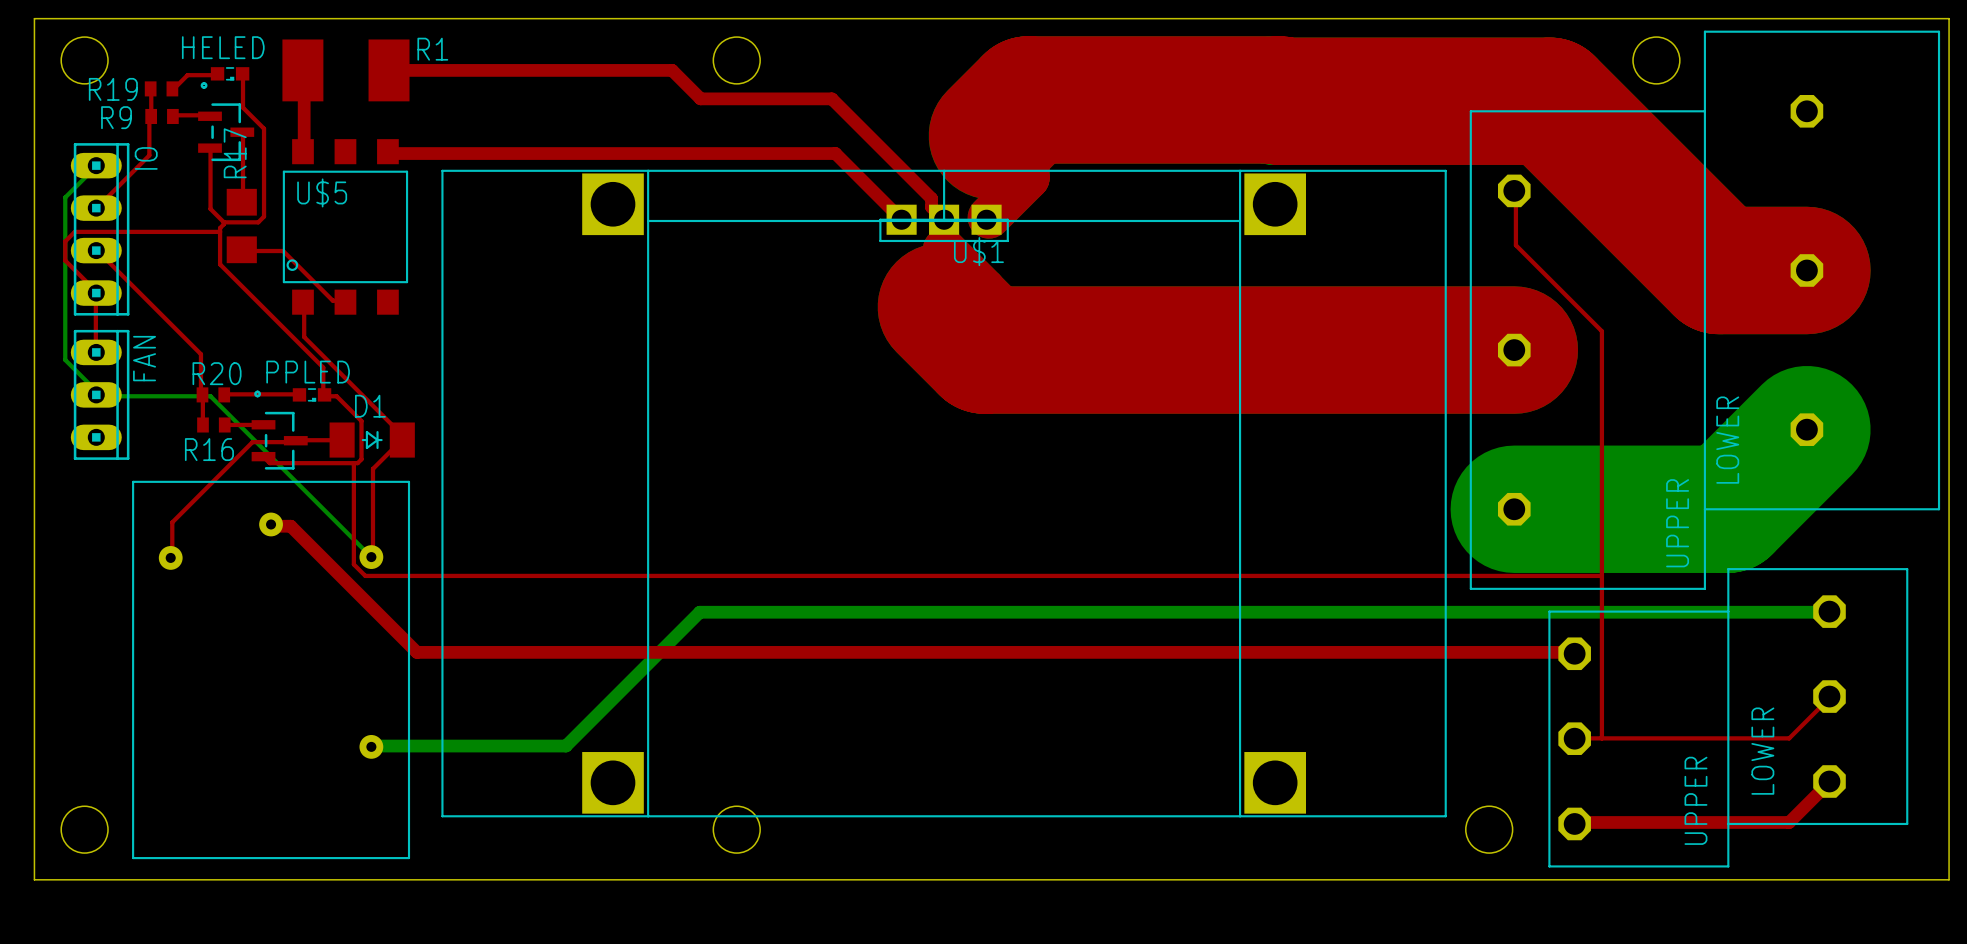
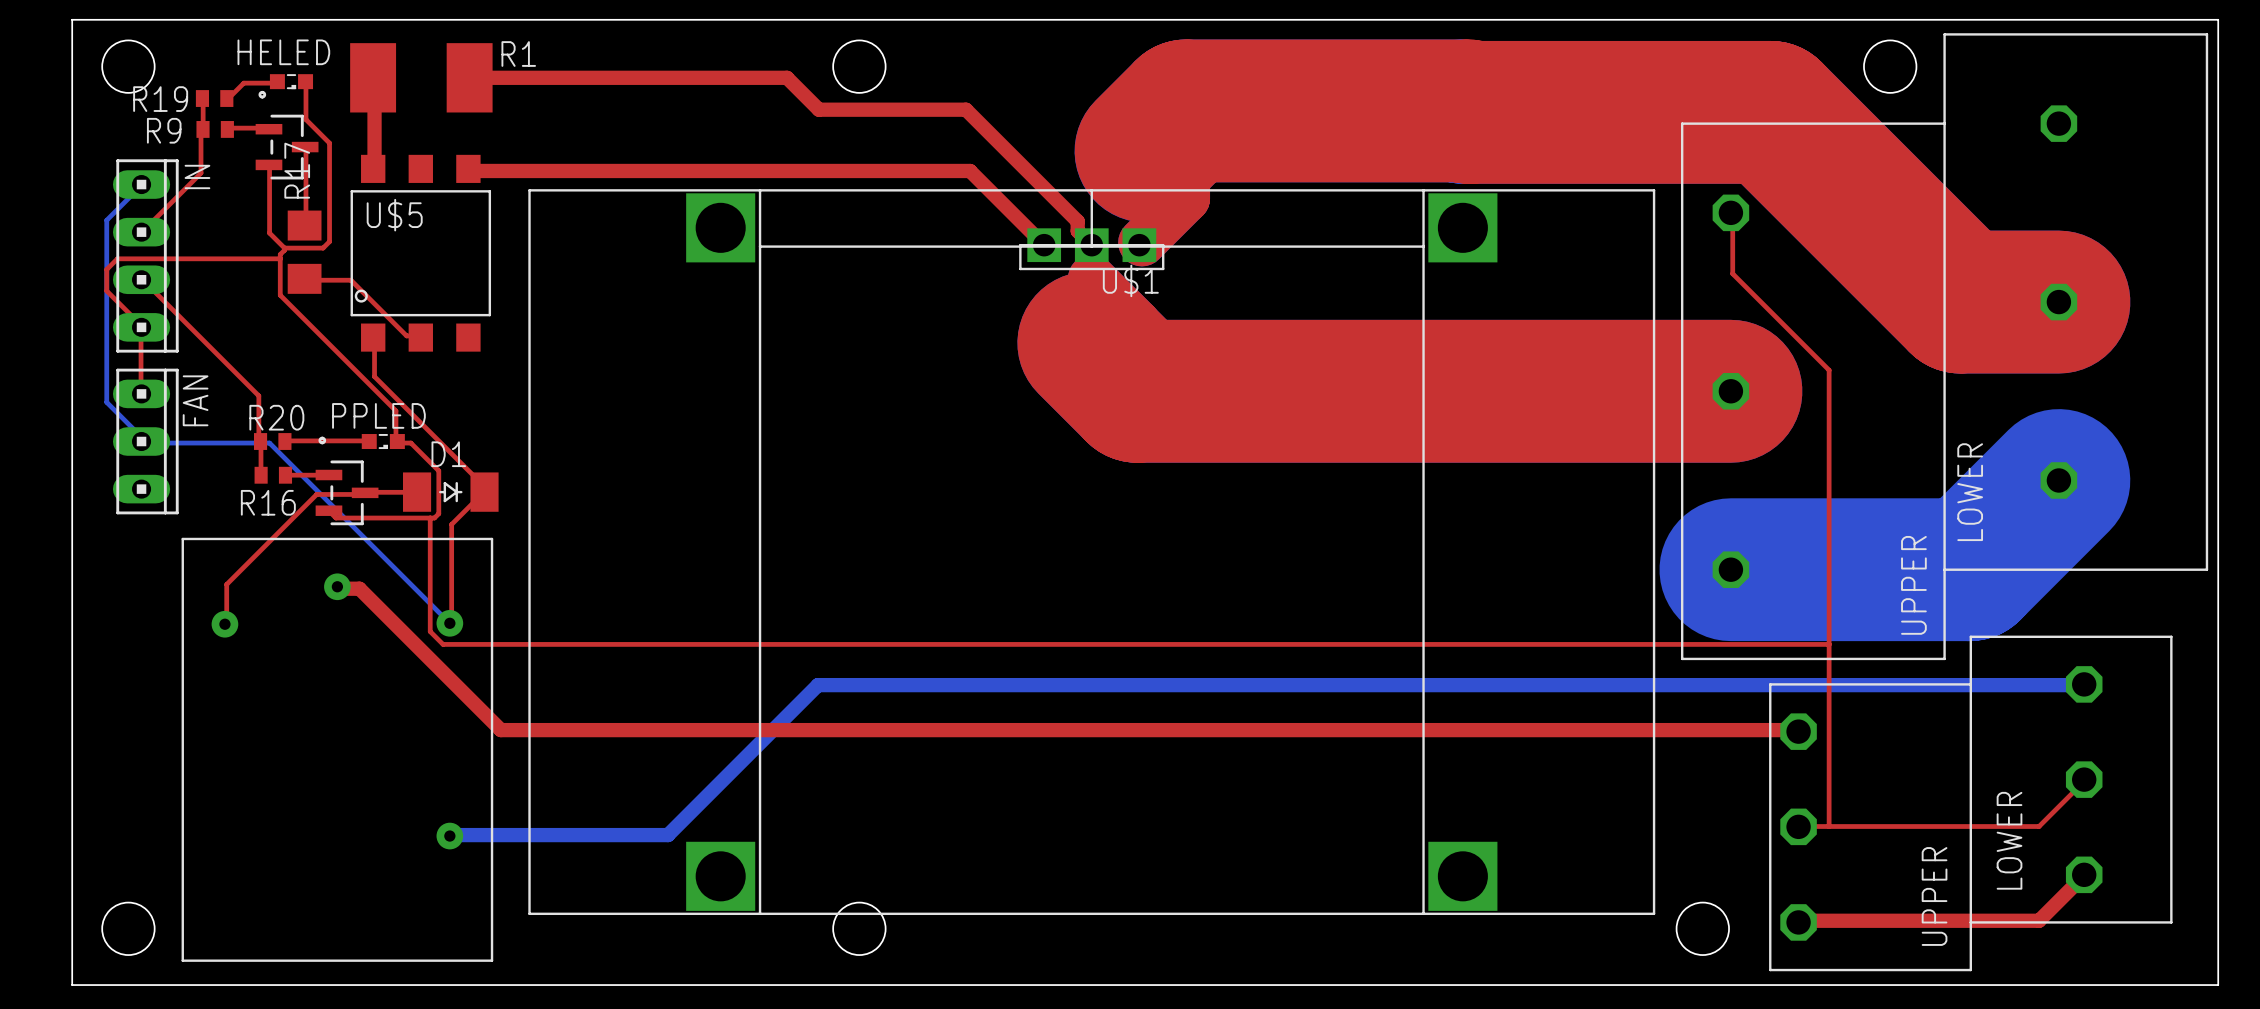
IO name: IO (146, 158) -> IN (197, 176)

